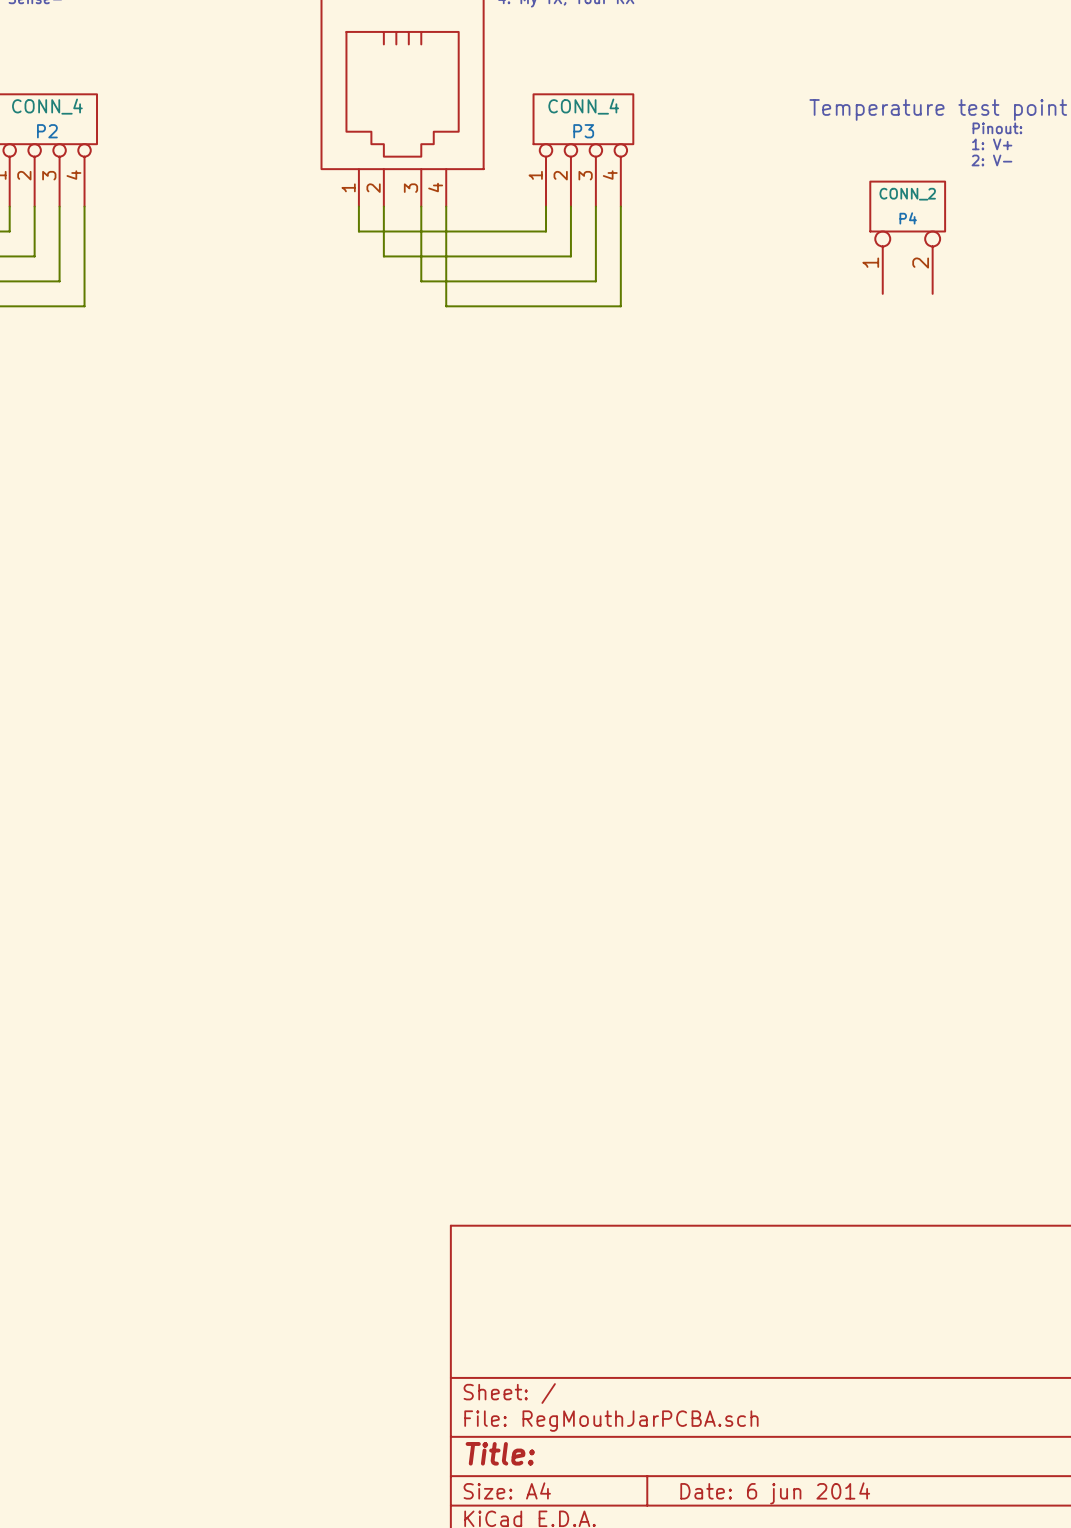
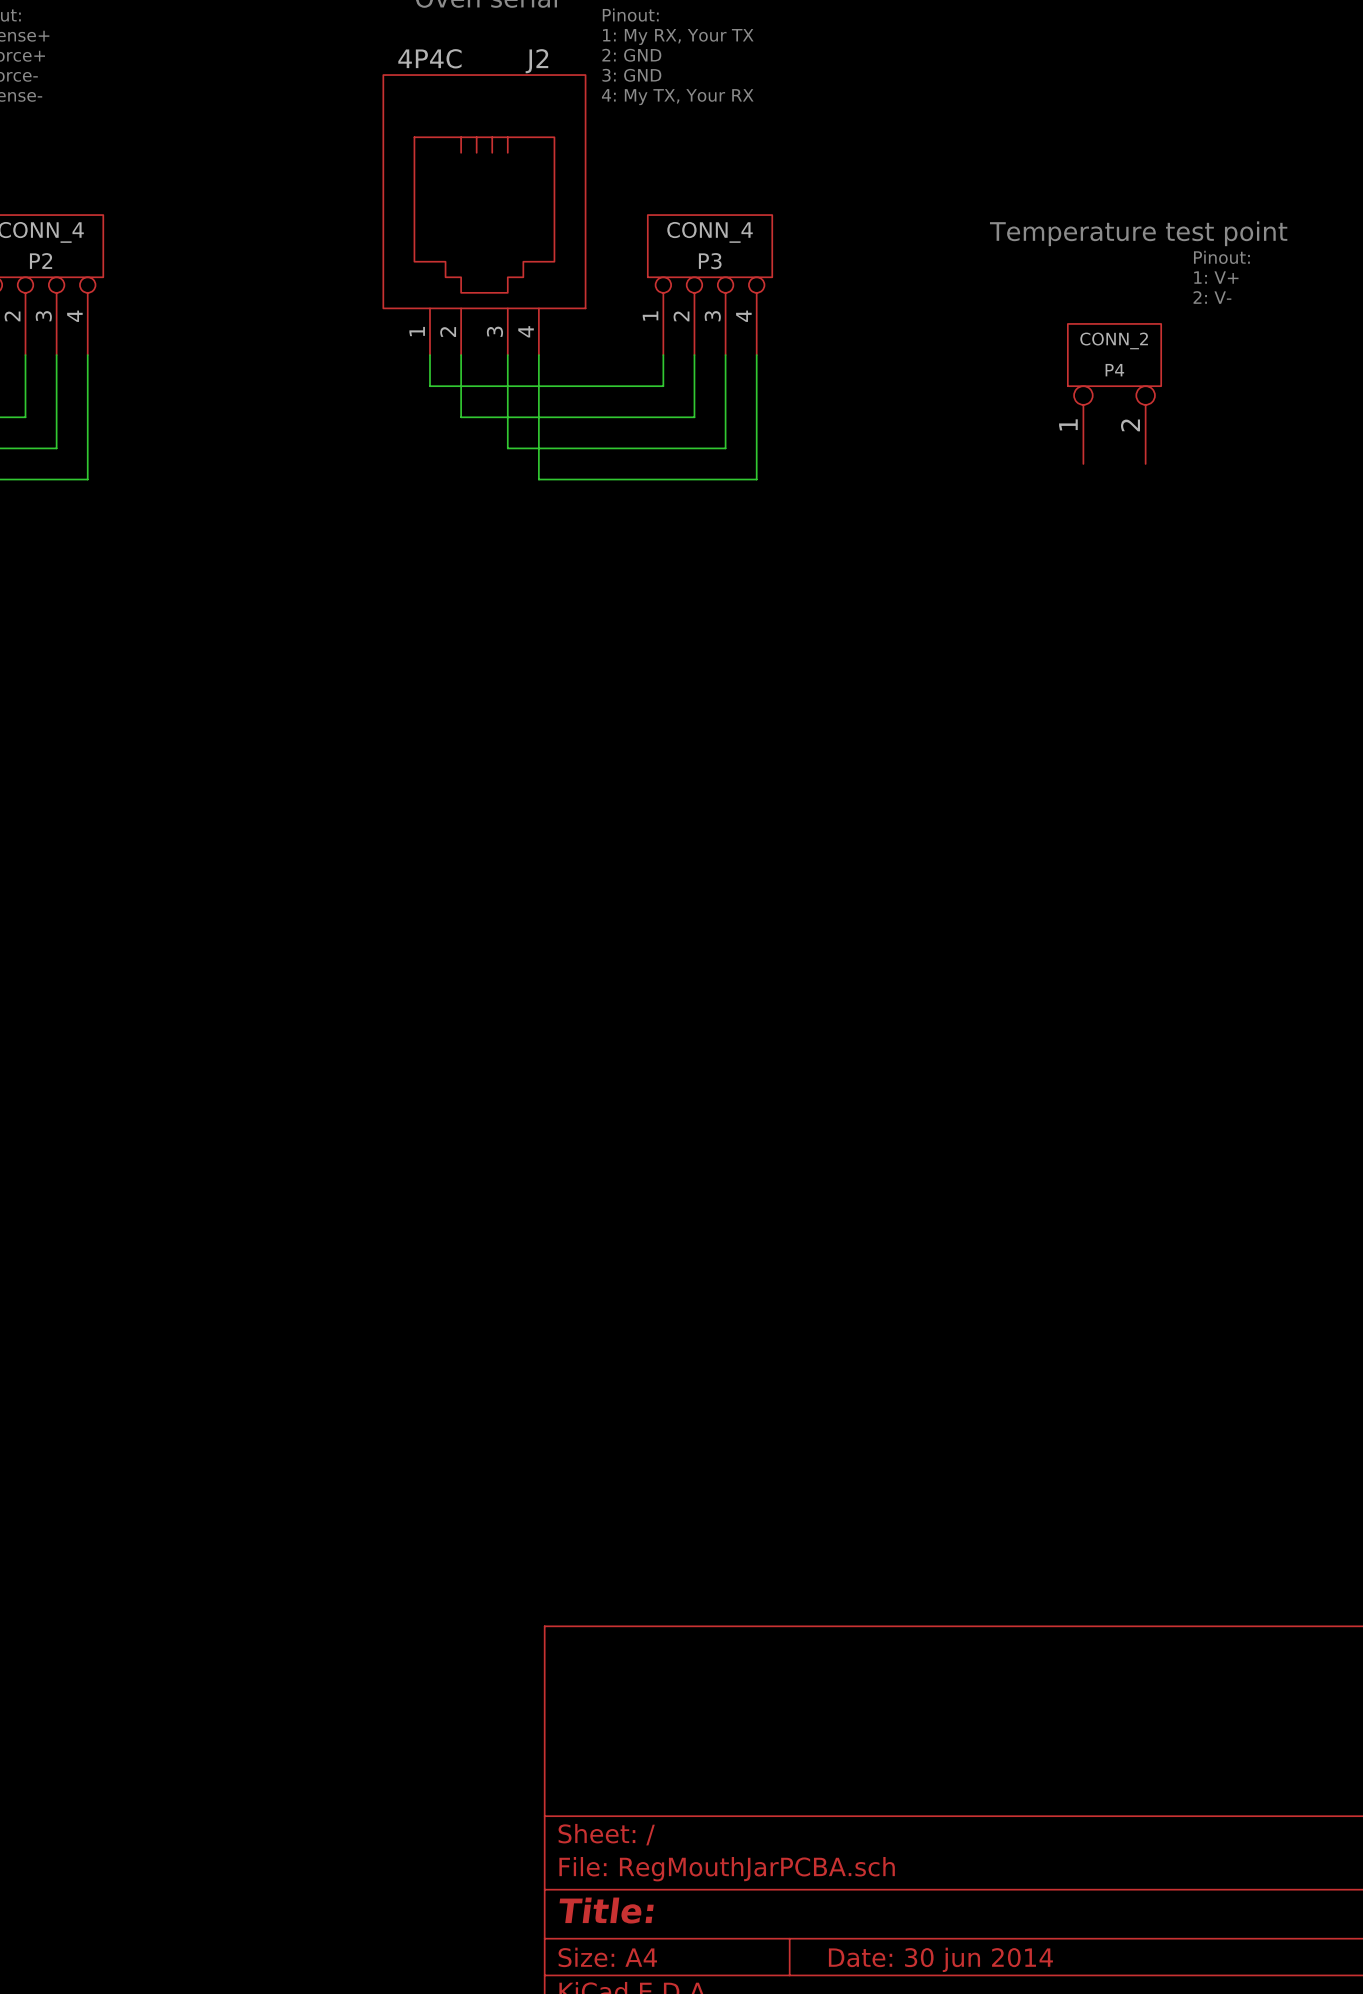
title block: Date: 6 jun 2014 (775, 1493) -> Date: 30 jun 2014 (940, 1959)

